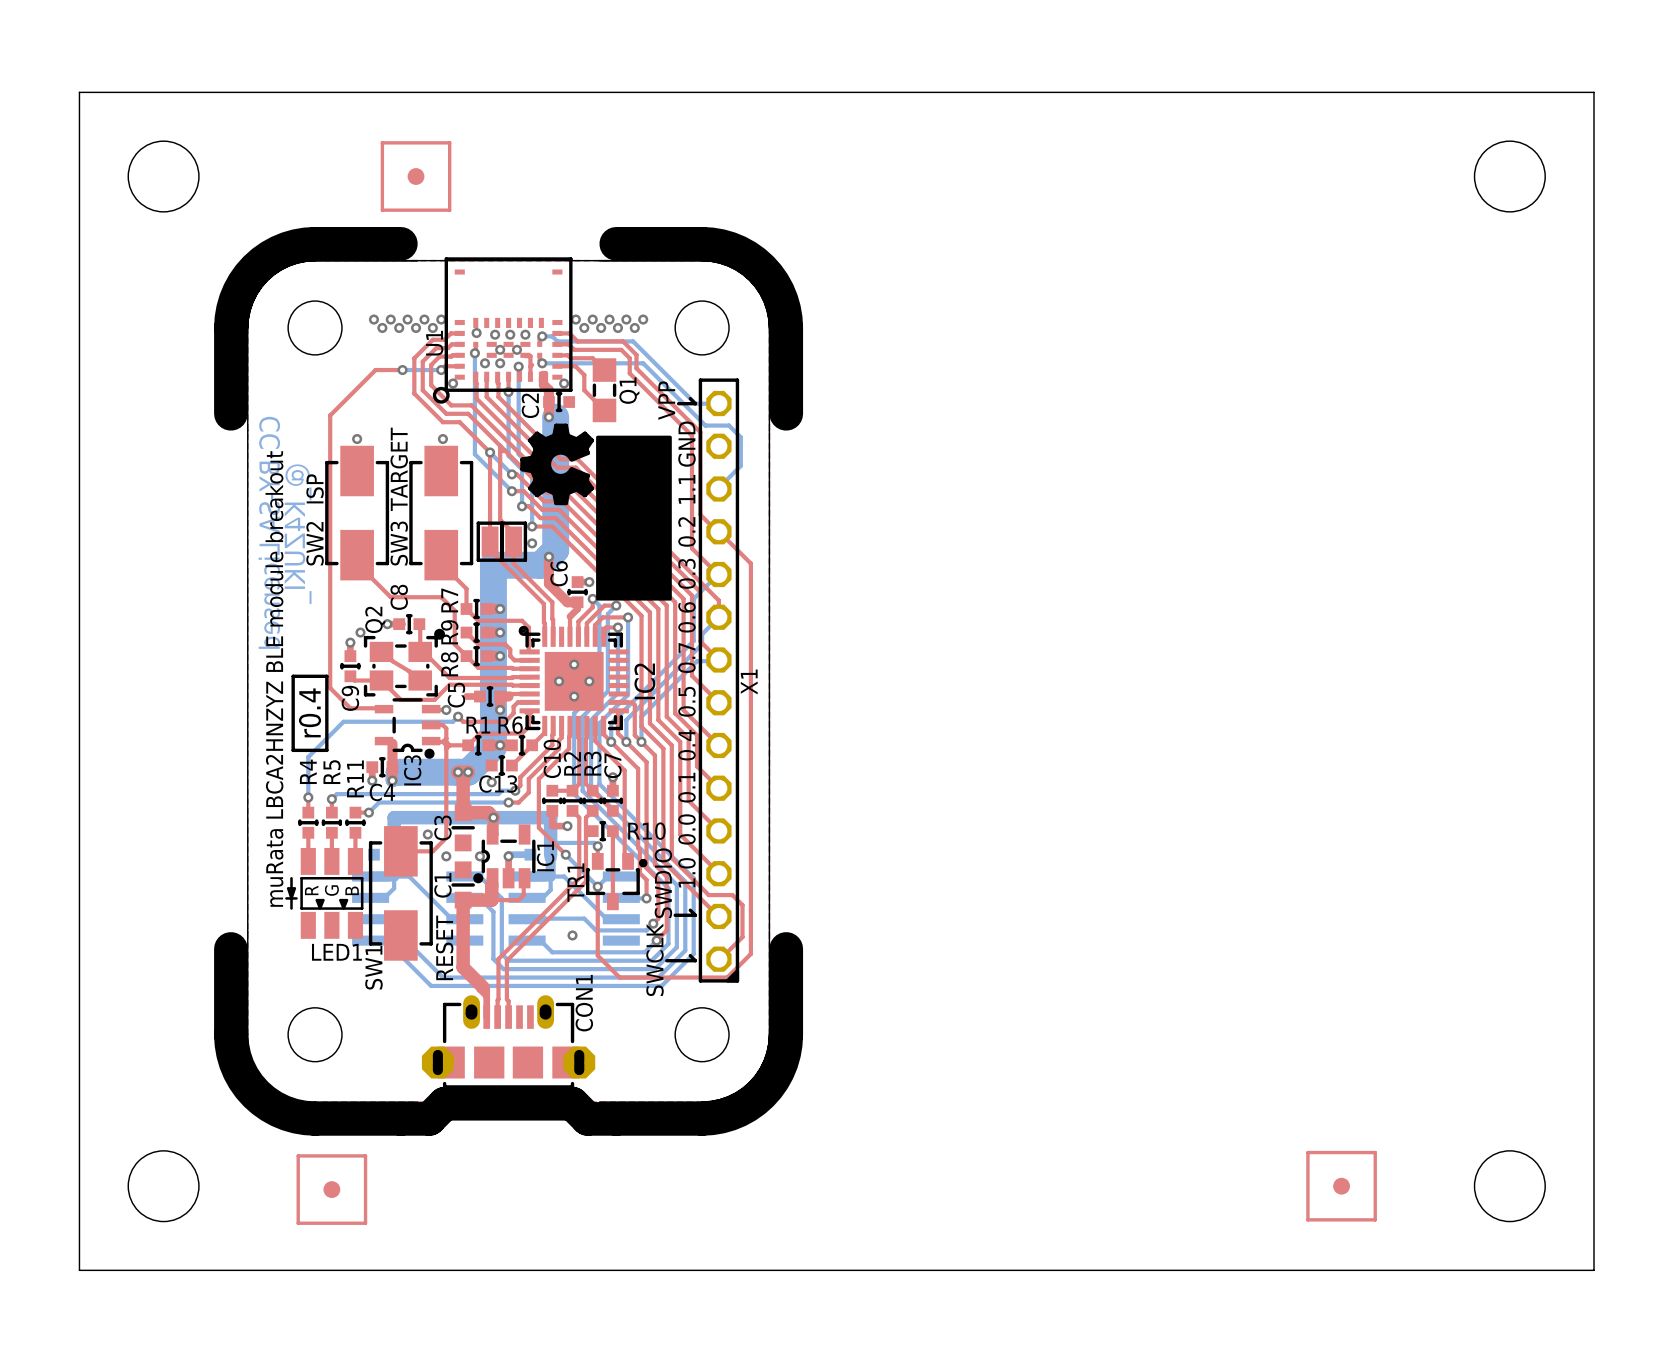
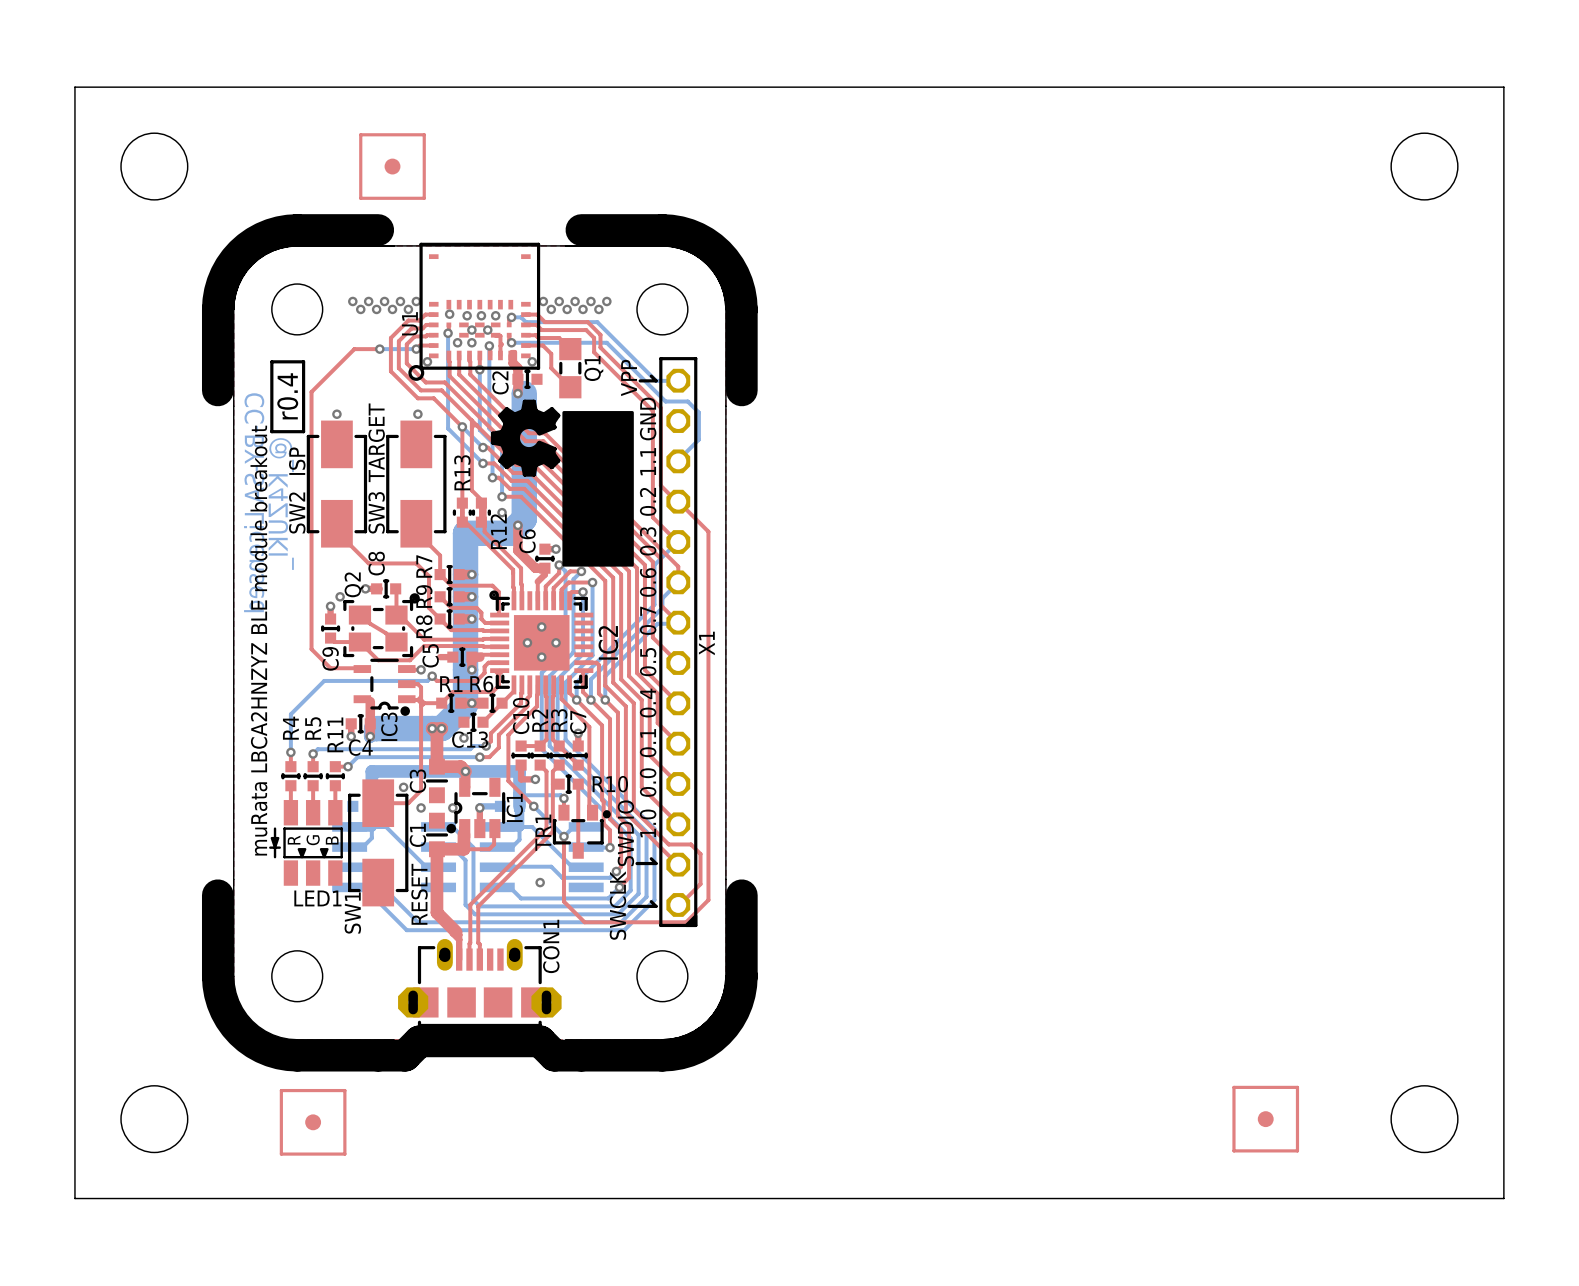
part: (490, 541) -> none
part: (513, 541) -> none
R13: none -> (462, 512)
R12: none -> (481, 512)
drawing position: (310, 713) -> (287, 396)

